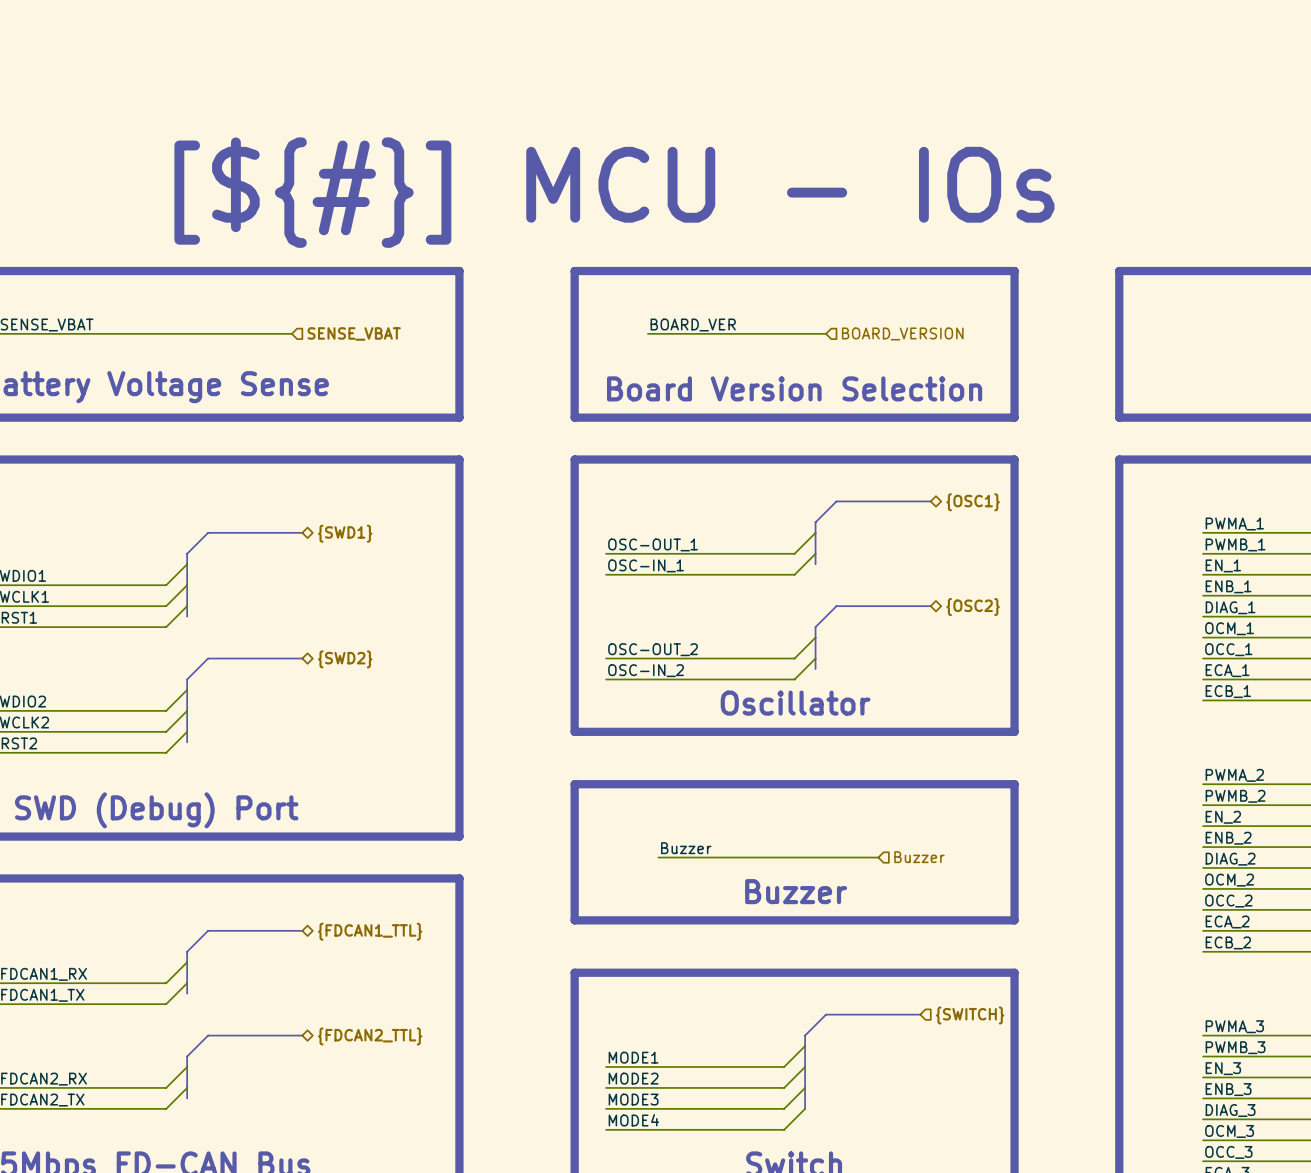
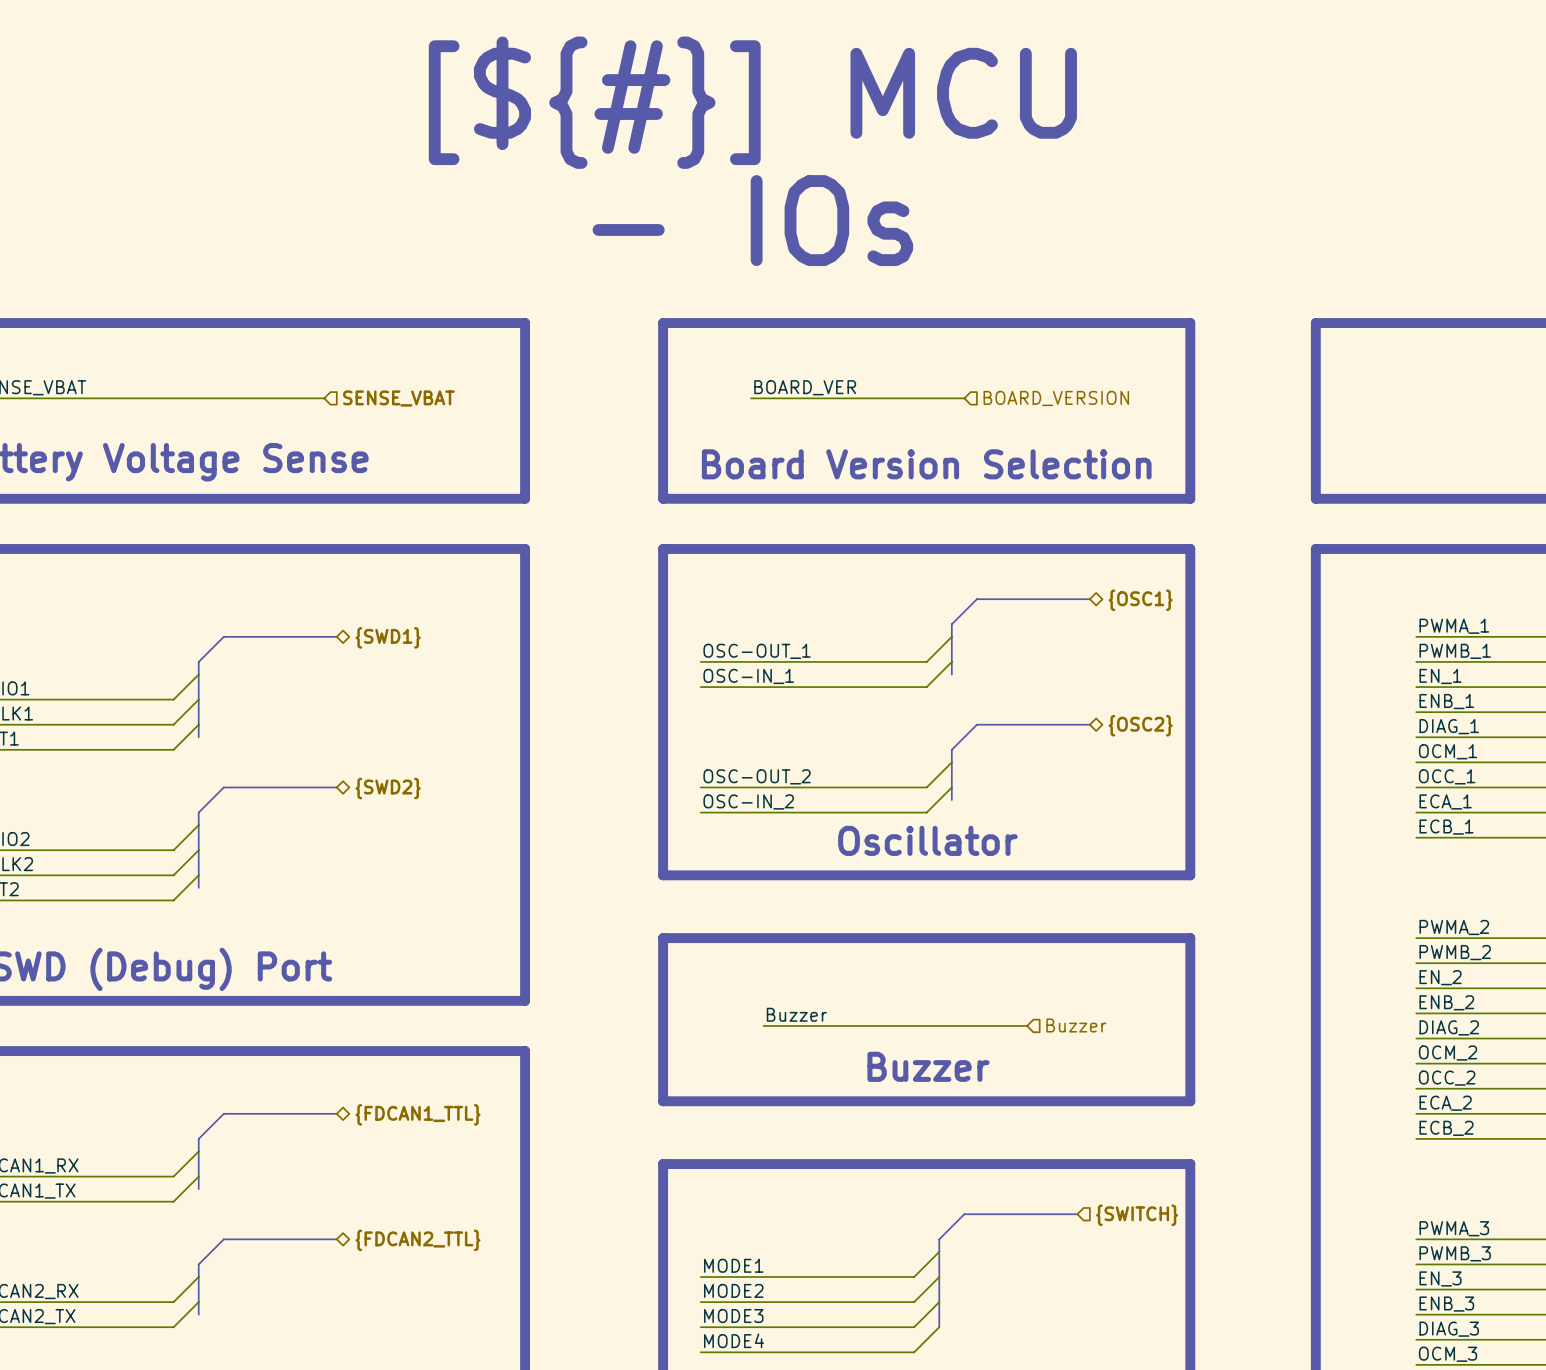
text: none -> - IOs (752, 220)
text: [${#}] MCU - IOs (614, 192) -> [${#}] MCU (752, 102)

